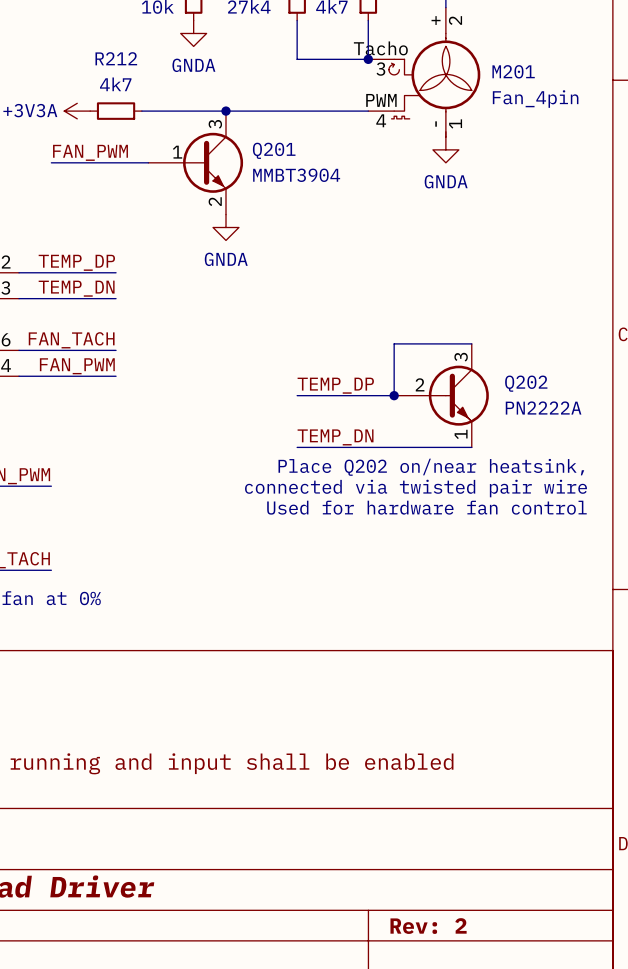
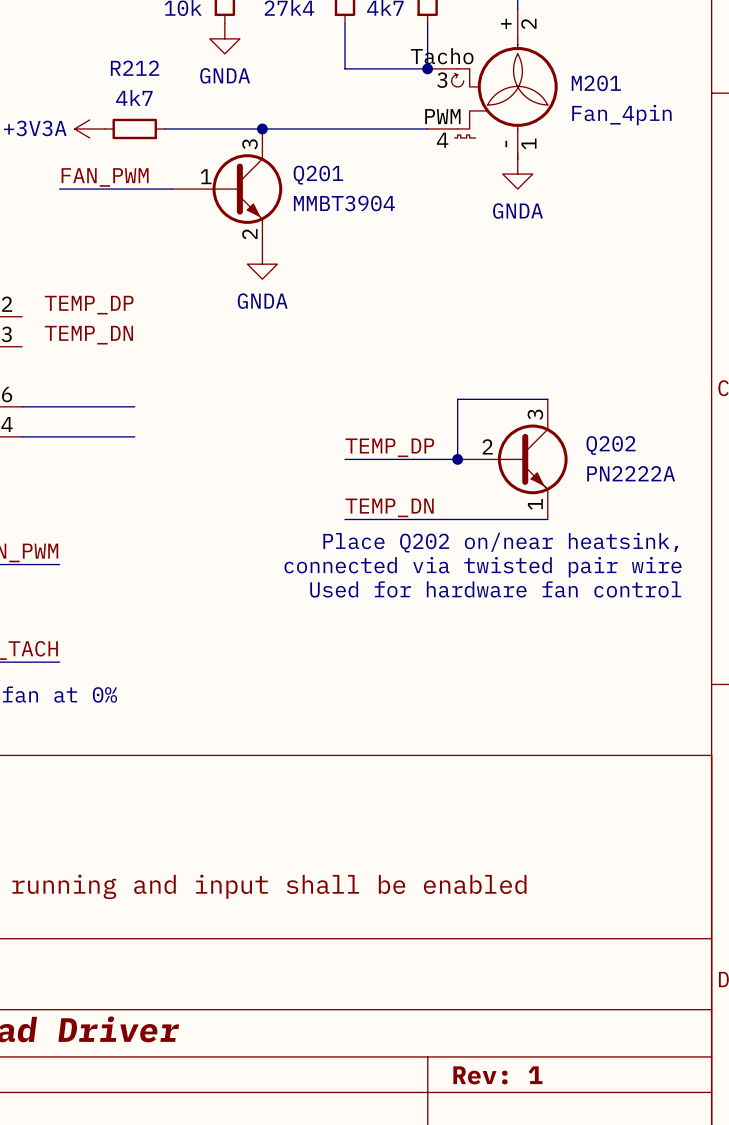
wire: (19, 272) (116, 272) -> none
wire: (19, 298) (116, 298) -> none
label: FAN_TACH (71, 340) -> none
label: FAN_PWM (77, 366) -> none
title block: Rev: 2 (428, 926) -> Rev: 1 (497, 1075)

